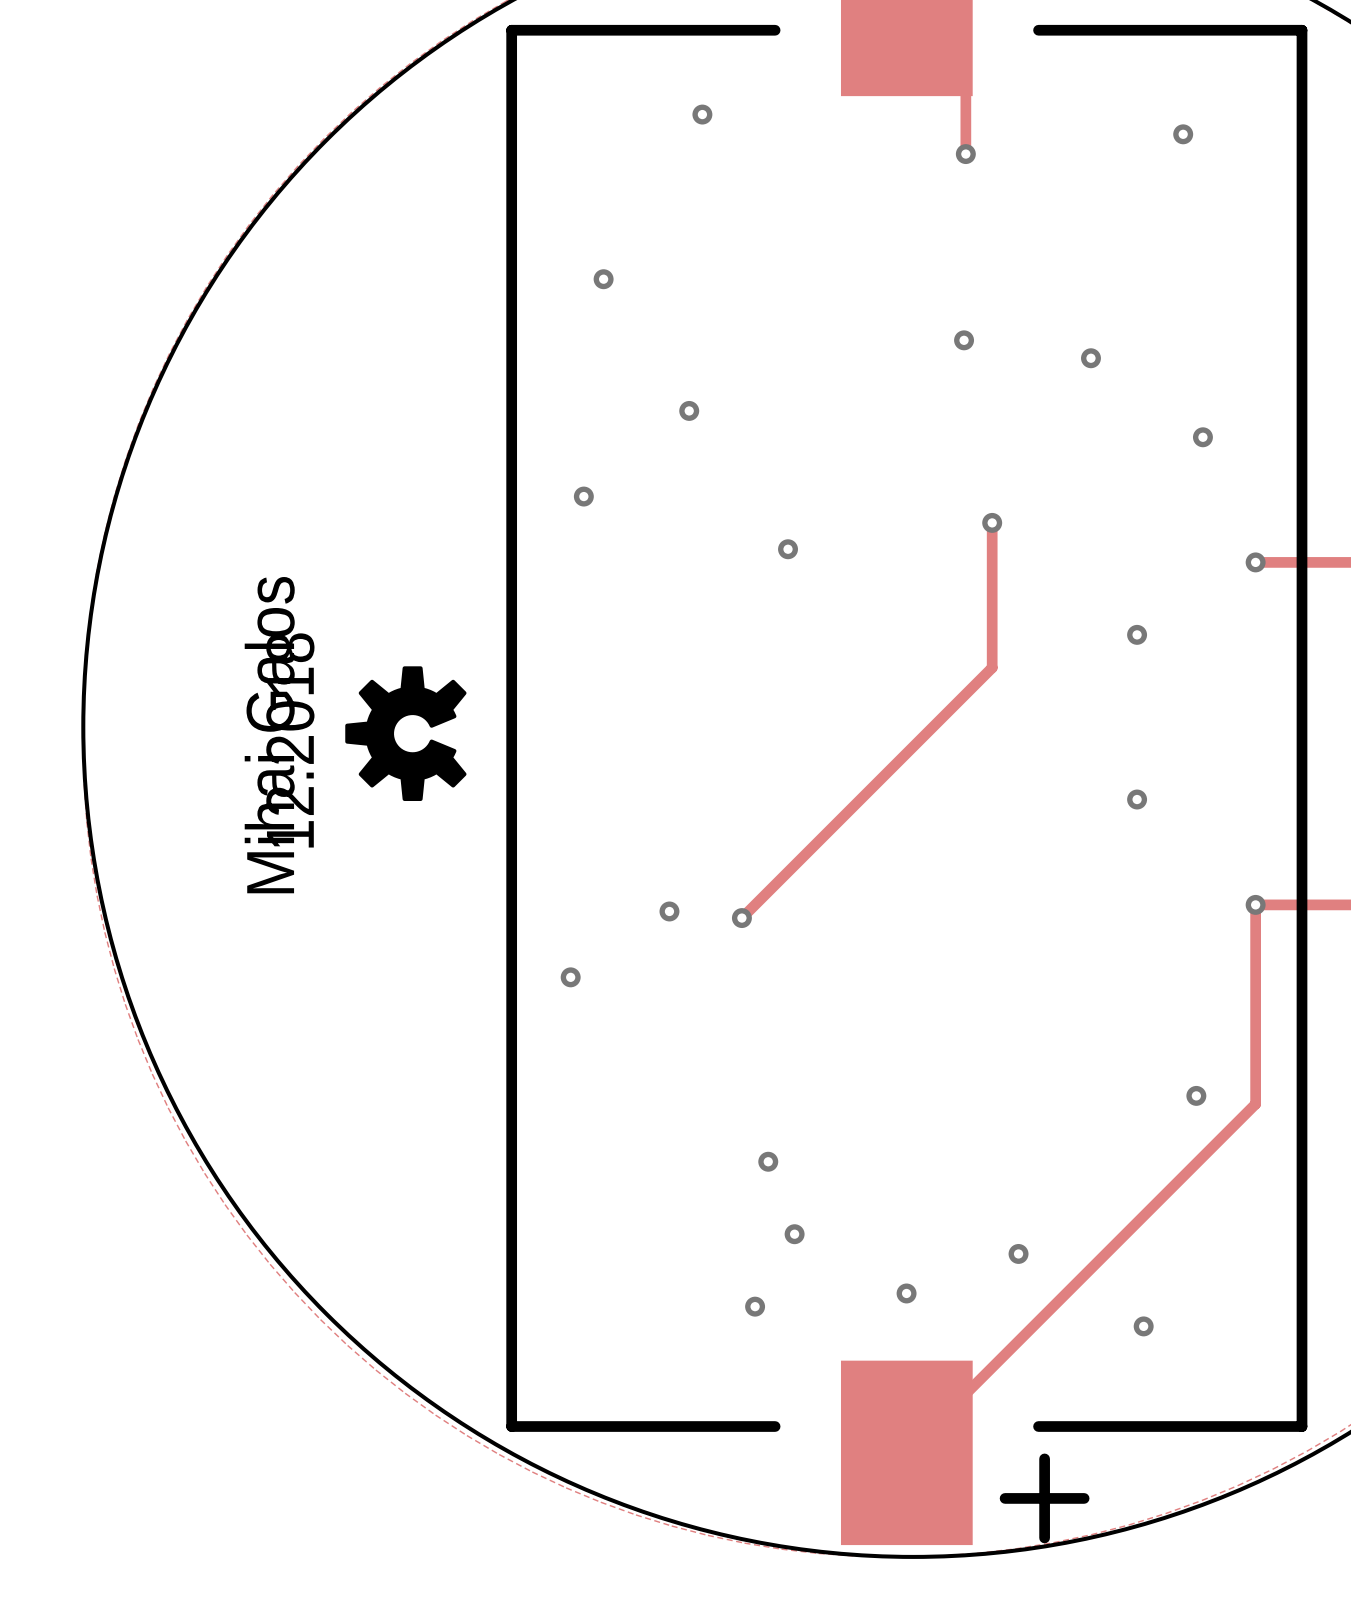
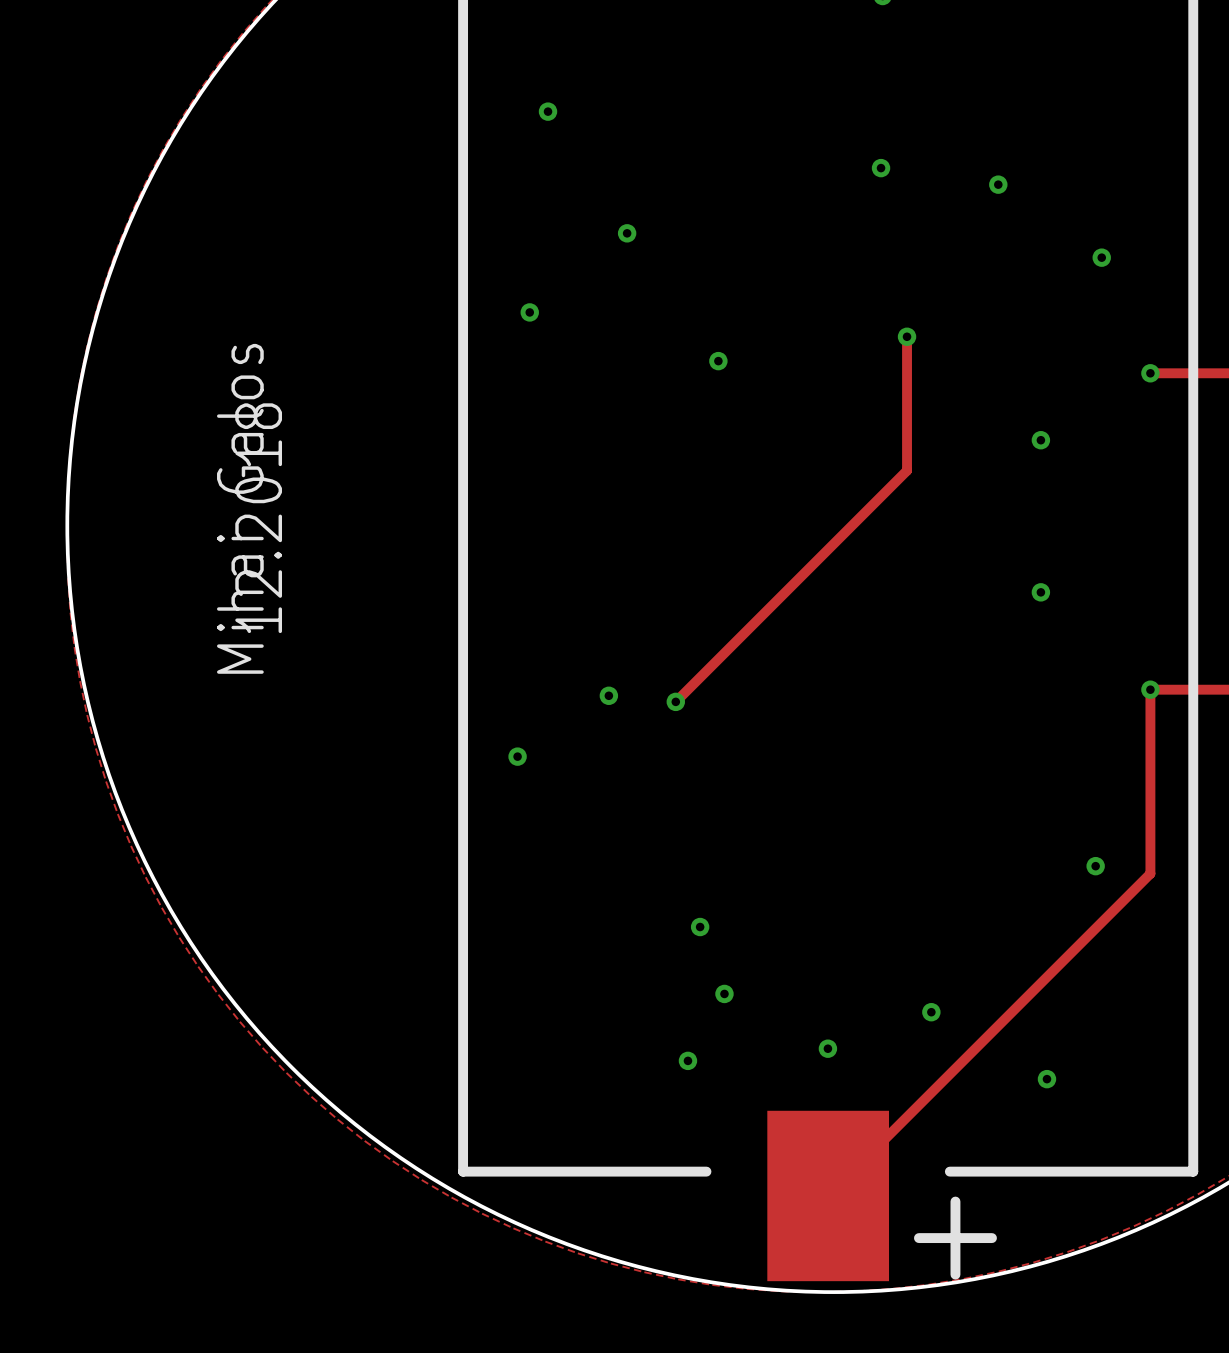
drawing: [345, 666, 467, 802] -> none

